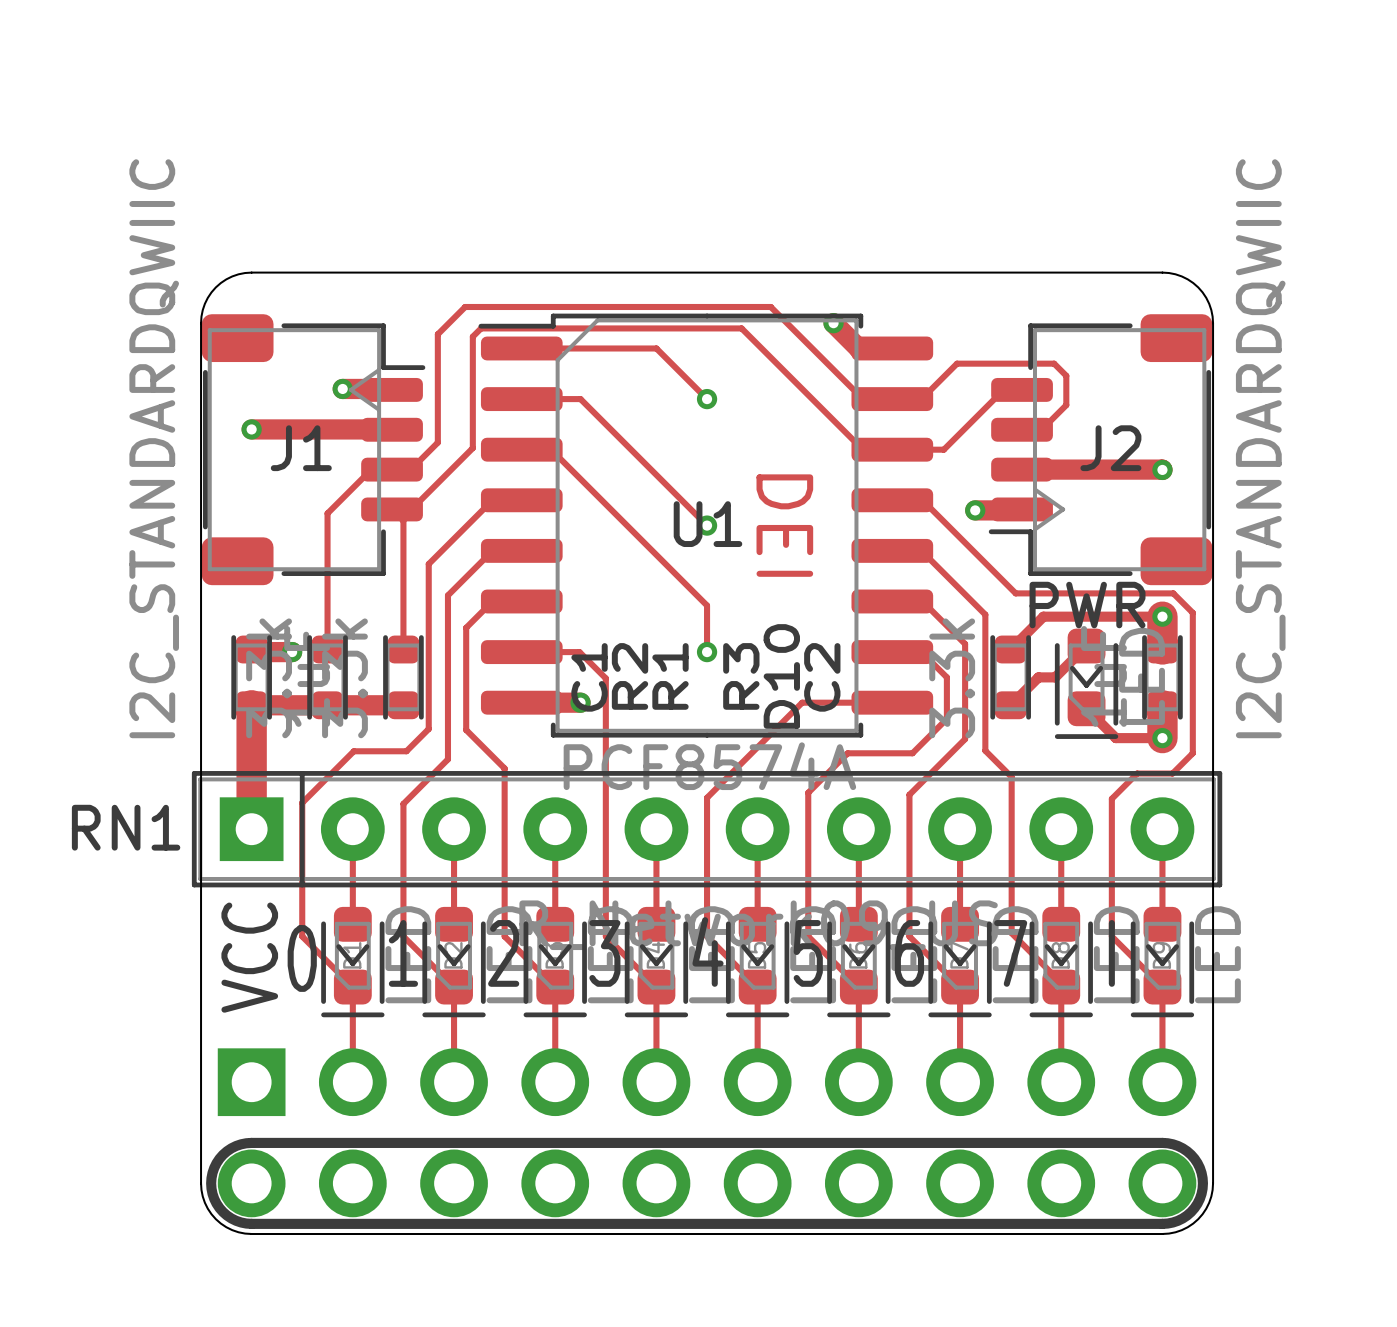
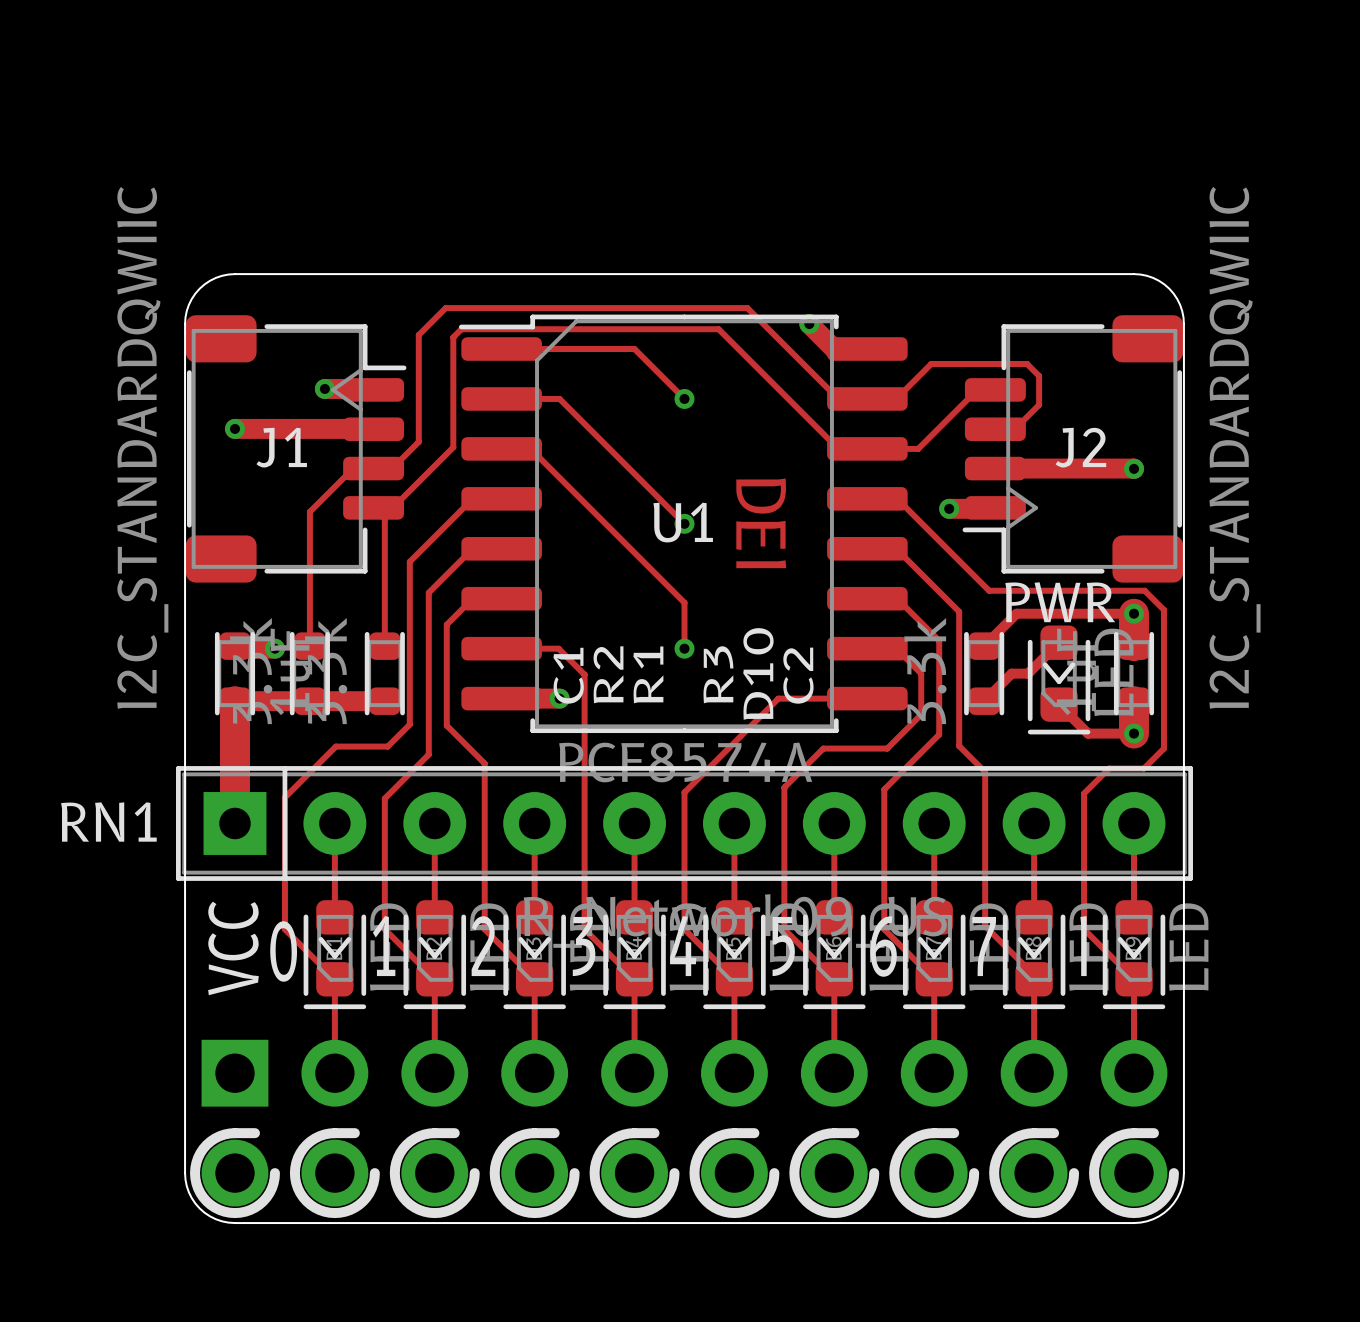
line: (251, 1142) (236, 1146) (223, 1154) (214, 1167) (211, 1183) (214, 1198) (223, 1212) (236, 1220) (251, 1223) (1162, 1223) (1182, 1218) (1197, 1203) (1202, 1188) (1201, 1172) (1194, 1158) (1182, 1148) (1162, 1142) (1081, 1142) -> (234, 1133) (215, 1138) (206, 1144) (198, 1157) (195, 1178) (198, 1188) (206, 1201) (215, 1207) (229, 1212) (250, 1210) (263, 1201) (269, 1193) (274, 1173)
line: (271, 1142) (352, 1142) -> (374, 1173) (369, 1193) (363, 1201) (350, 1210) (329, 1212) (314, 1207) (306, 1201) (297, 1188) (295, 1178) (297, 1157) (306, 1144) (314, 1138) (334, 1133)
line: (373, 1142) (454, 1142) -> (474, 1173) (469, 1193) (463, 1201) (450, 1210) (429, 1212) (414, 1207) (406, 1201) (397, 1188) (395, 1178) (397, 1157) (406, 1144) (414, 1138) (434, 1133)
line: (474, 1142) (555, 1142) -> (574, 1173) (569, 1193) (562, 1201) (549, 1210) (529, 1212) (514, 1207) (506, 1201) (497, 1188) (495, 1178) (497, 1157) (506, 1144) (514, 1138) (534, 1133)
line: (575, 1142) (656, 1142) -> (674, 1173) (669, 1193) (662, 1201) (649, 1210) (629, 1212) (614, 1207) (606, 1201) (597, 1188) (594, 1178) (597, 1157) (606, 1144) (614, 1138) (634, 1133)
line: (676, 1142) (757, 1142) -> (774, 1173) (769, 1193) (762, 1201) (749, 1210) (729, 1212) (714, 1207) (706, 1201) (697, 1188) (694, 1178) (697, 1157) (706, 1144) (714, 1138) (734, 1133)
line: (777, 1142) (858, 1142) -> (874, 1173) (868, 1193) (862, 1201) (849, 1210) (829, 1212) (814, 1207) (806, 1201) (797, 1188) (794, 1178) (797, 1157) (806, 1144) (814, 1138) (834, 1133)
line: (879, 1142) (960, 1142) -> (974, 1173) (968, 1193) (962, 1201) (949, 1210) (929, 1212) (914, 1207) (905, 1201) (897, 1188) (894, 1178) (897, 1157) (905, 1144) (914, 1138) (934, 1133)
line: (980, 1142) (1061, 1142) -> (1074, 1173) (1068, 1193) (1062, 1201) (1049, 1210) (1028, 1212) (1014, 1207) (1005, 1201) (997, 1188) (994, 1178) (997, 1157) (1005, 1144) (1014, 1138) (1034, 1133)
line: none -> (1153, 1133) (1123, 1134) (1105, 1144) (1097, 1157) (1094, 1167) (1094, 1178) (1099, 1193) (1105, 1201) (1118, 1210) (1134, 1213) (1144, 1211) (1153, 1207) (1165, 1197) (1170, 1188) (1173, 1173)

